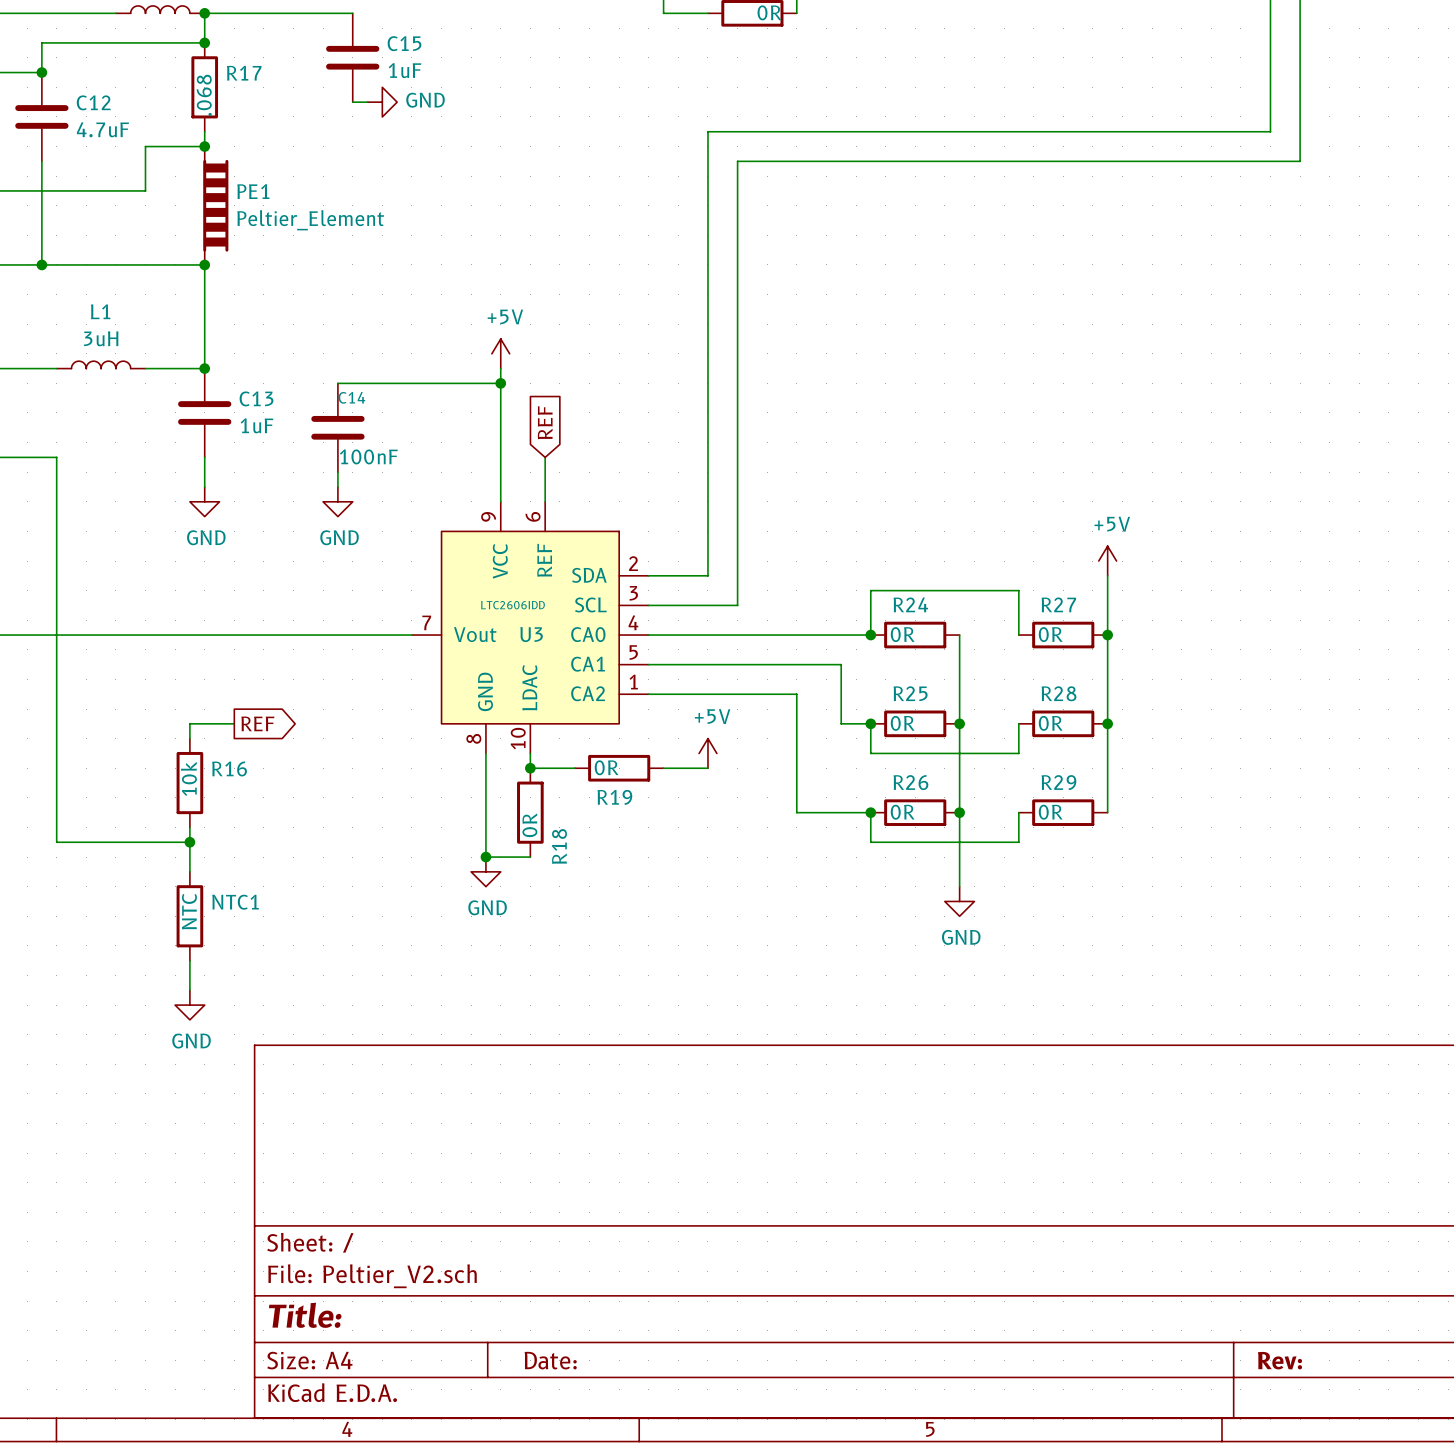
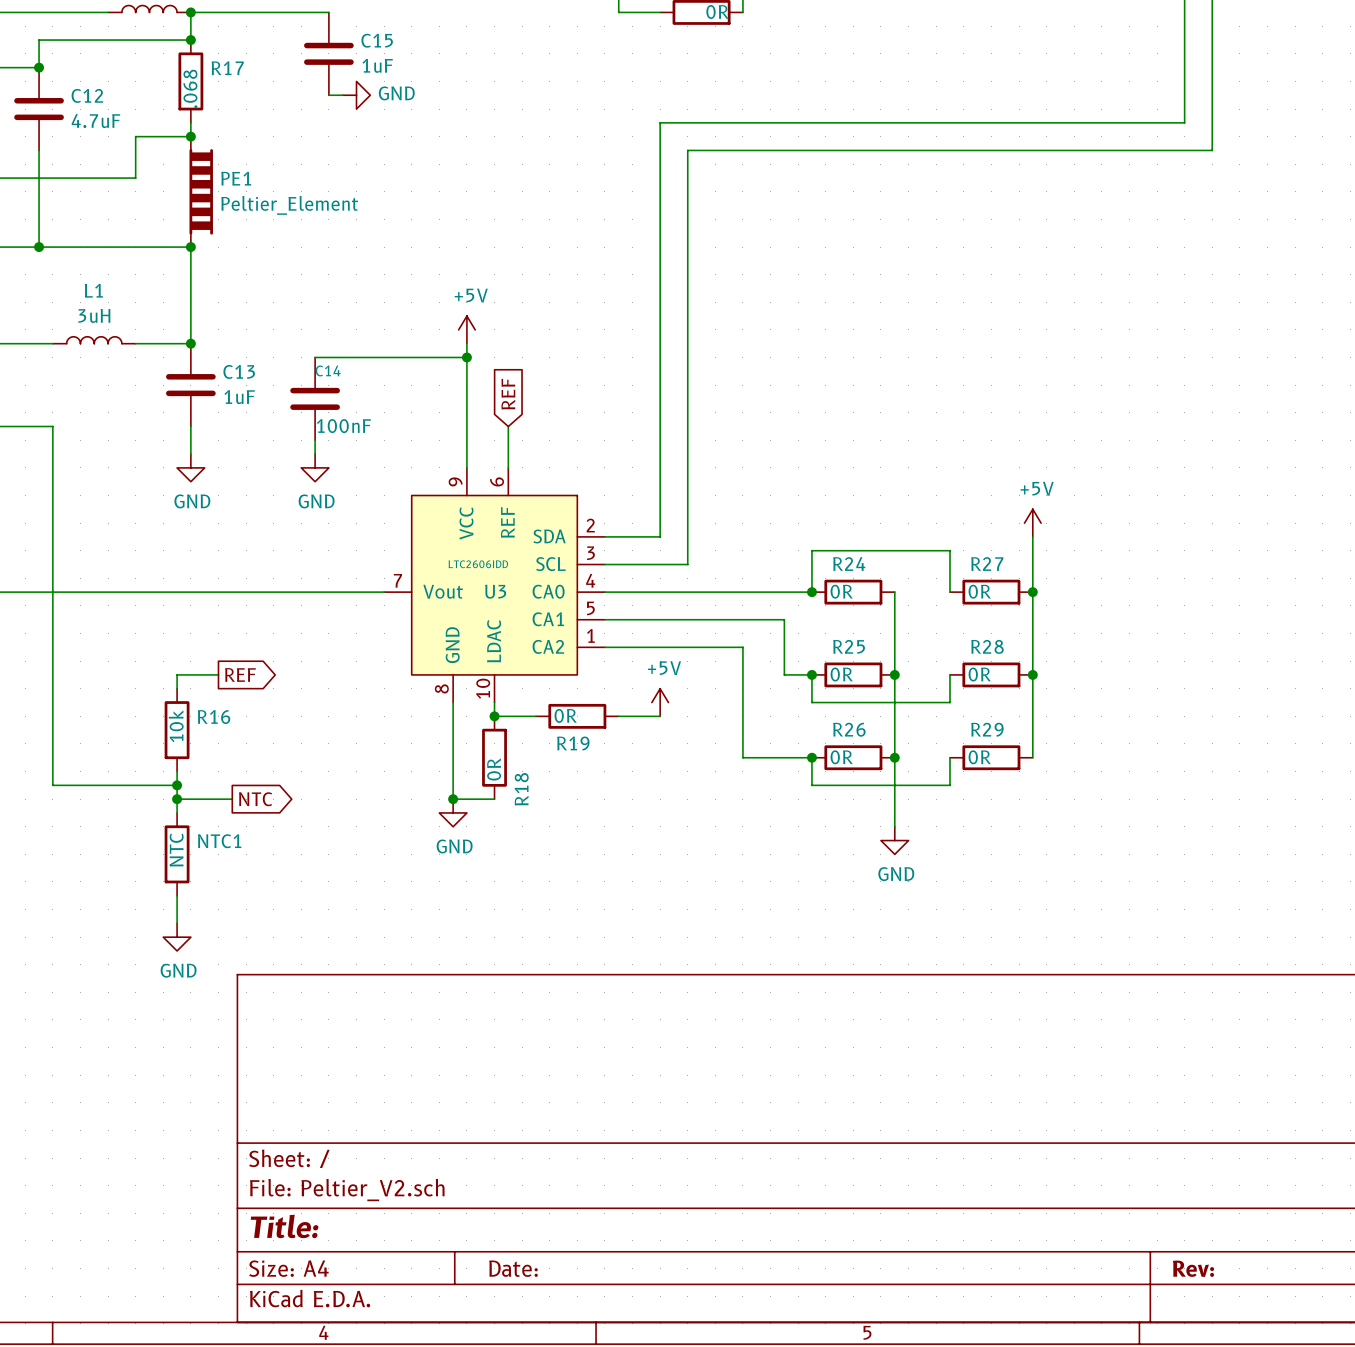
wire: none -> (177, 799) (232, 799)
junction: none -> (177, 799)
global label: none -> NTC (255, 799)

